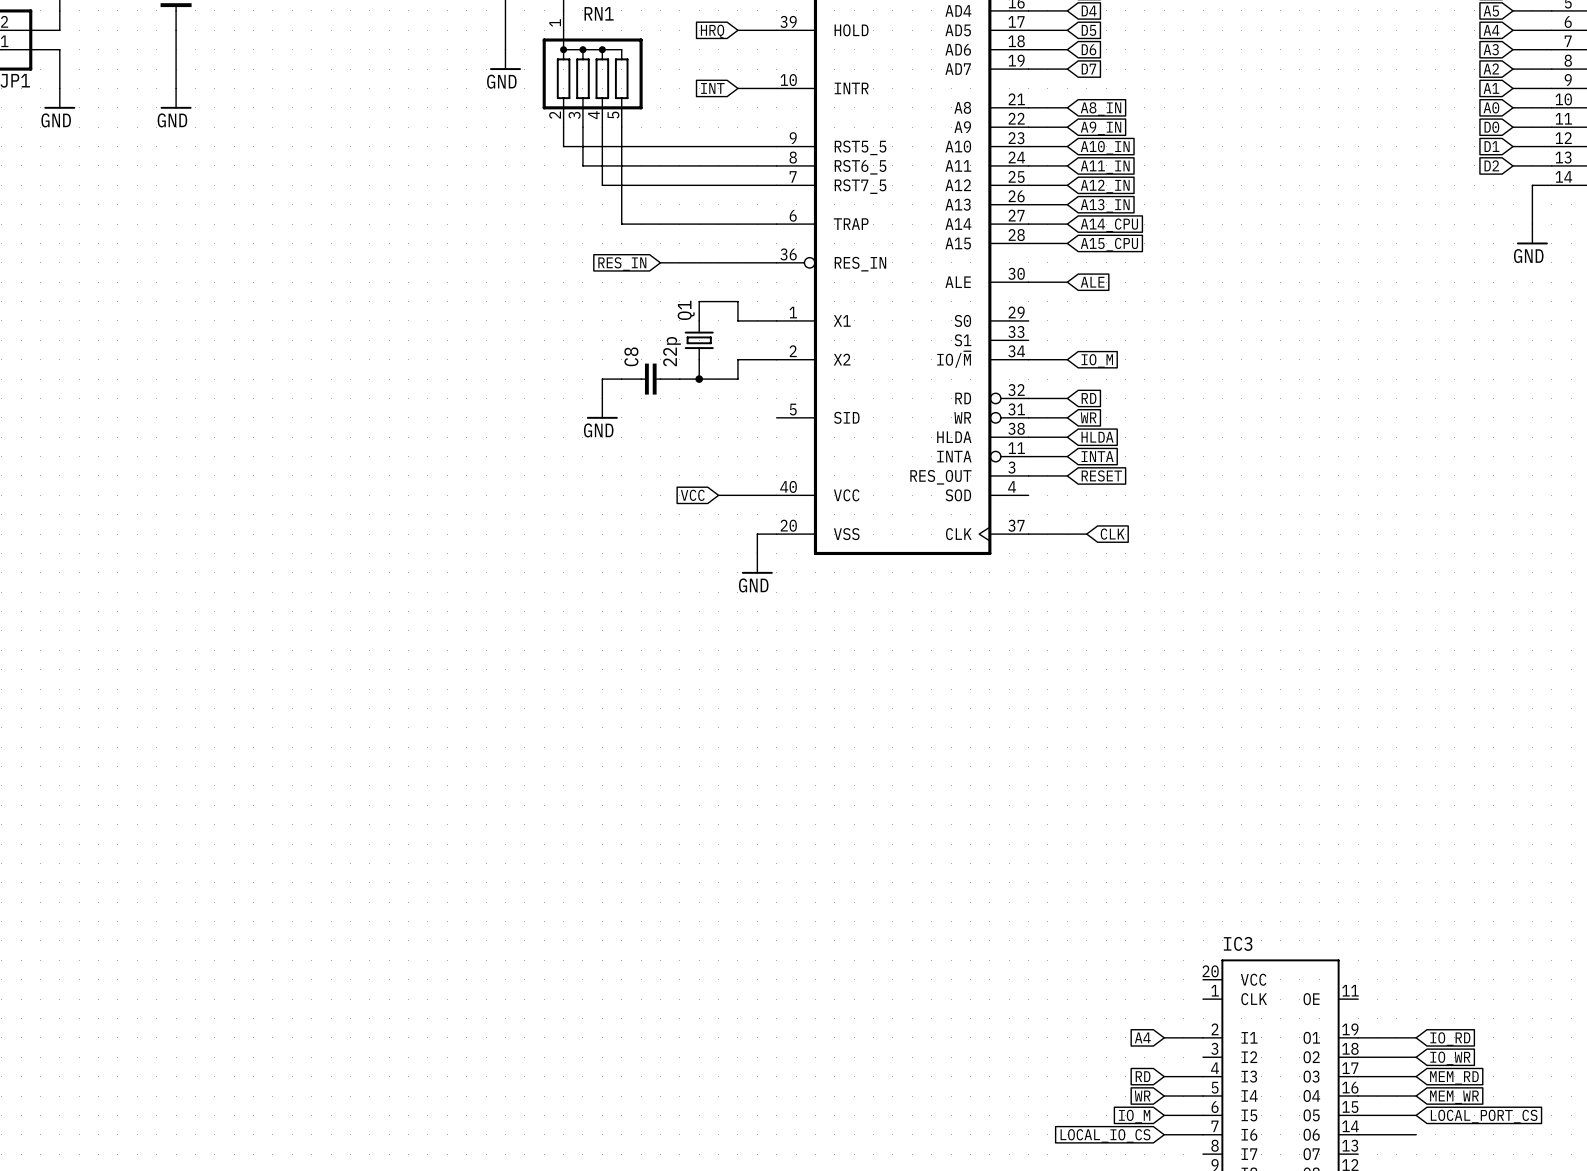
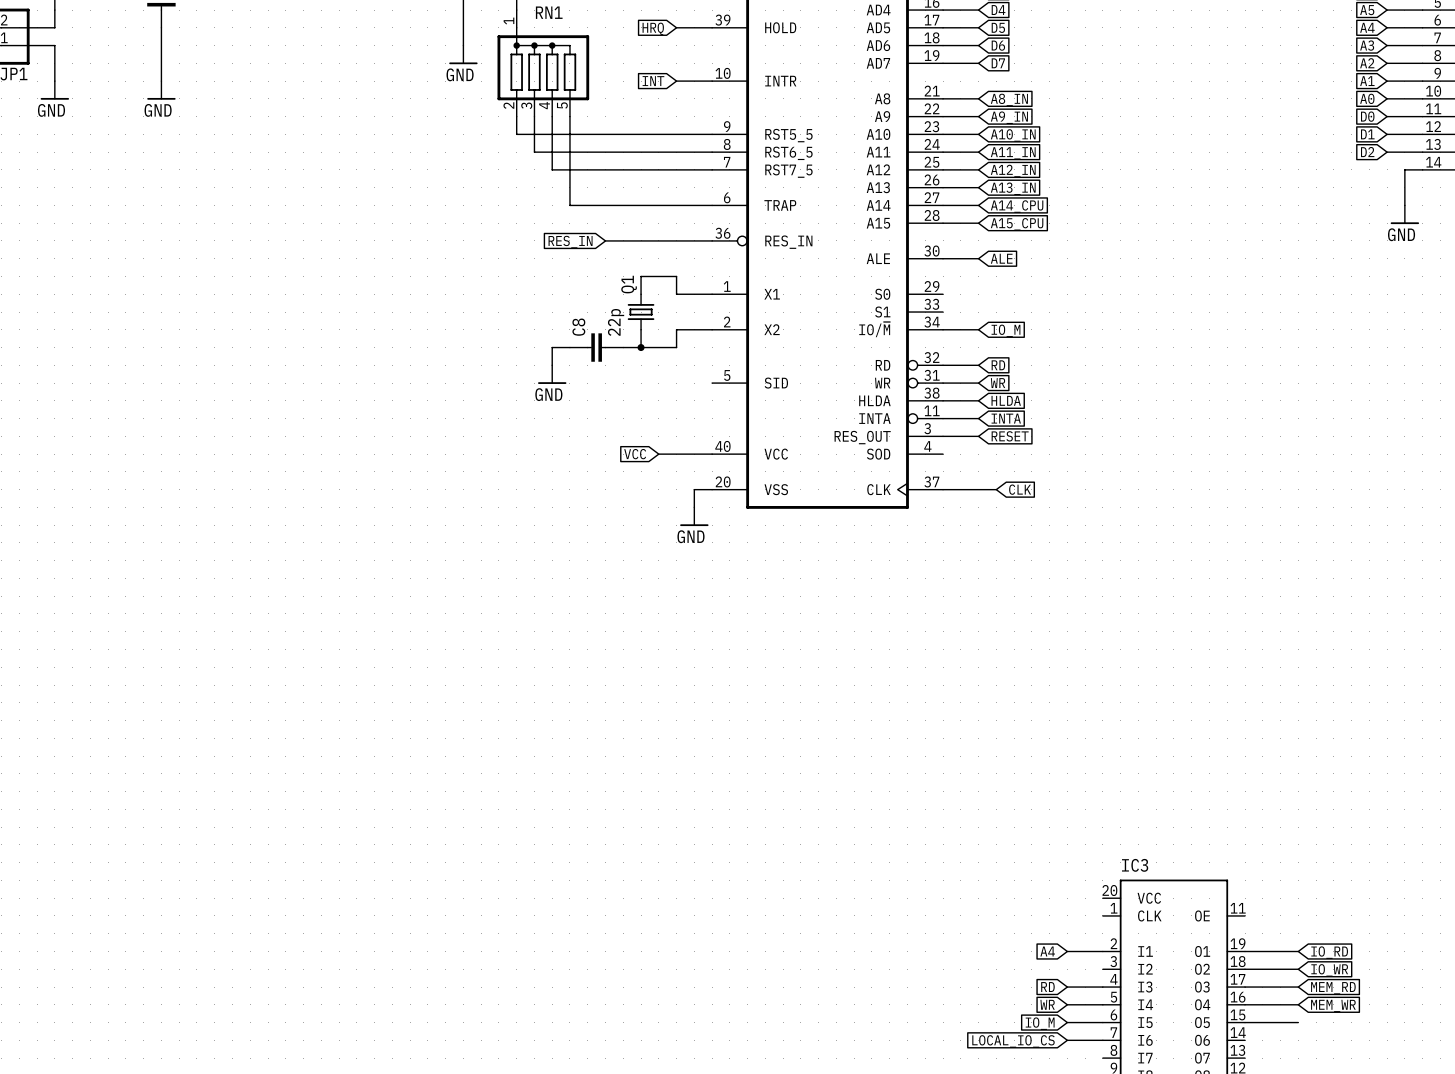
global label: LOCAL_PORT_CS (1484, 1116) -> none
wire: (1358, 1134) (1416, 1134) -> none

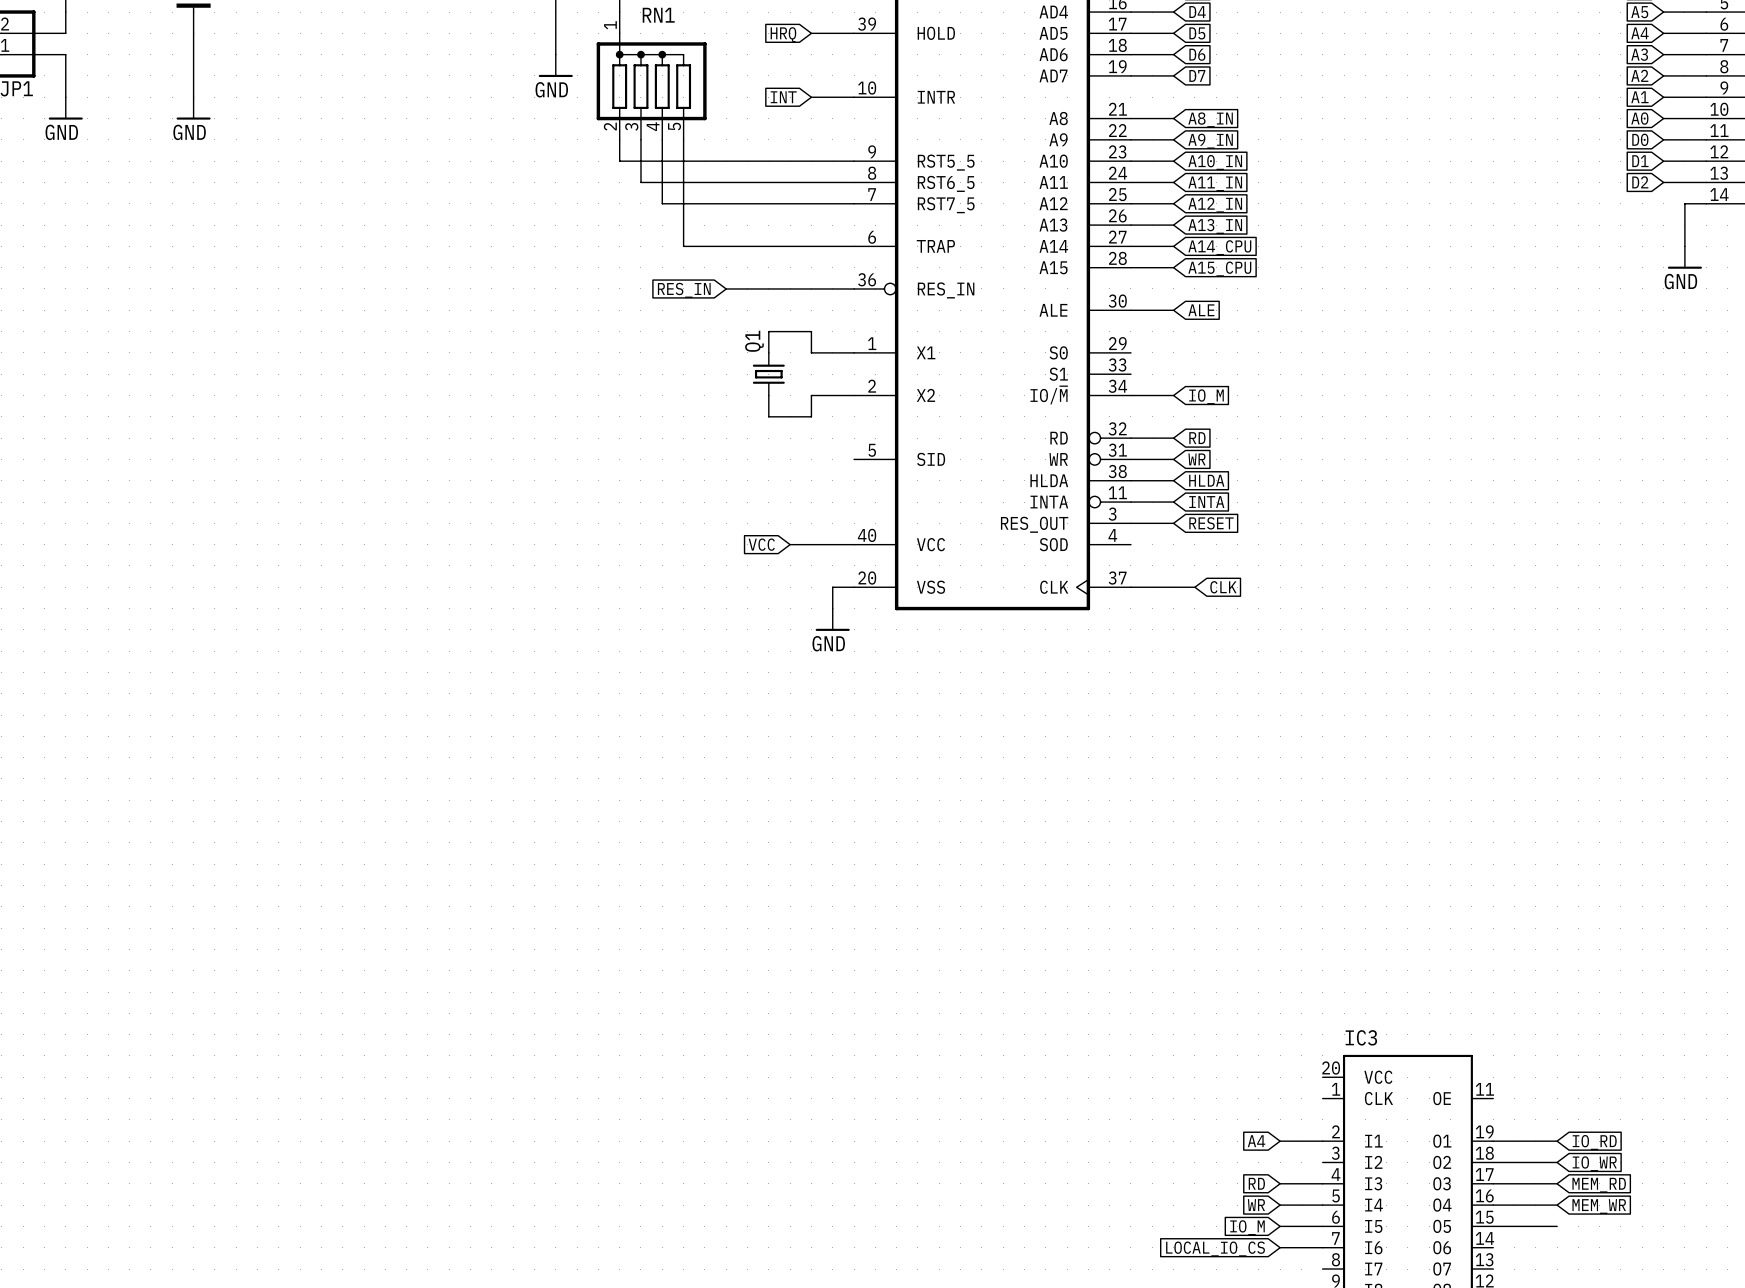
wire: (569, 347) (552, 347) (552, 365) -> none
C8: 22p (596, 347) -> none
wire: (623, 347) (641, 347) -> none
junction: (641, 347) -> none
power symbol: GND (552, 374) -> none

